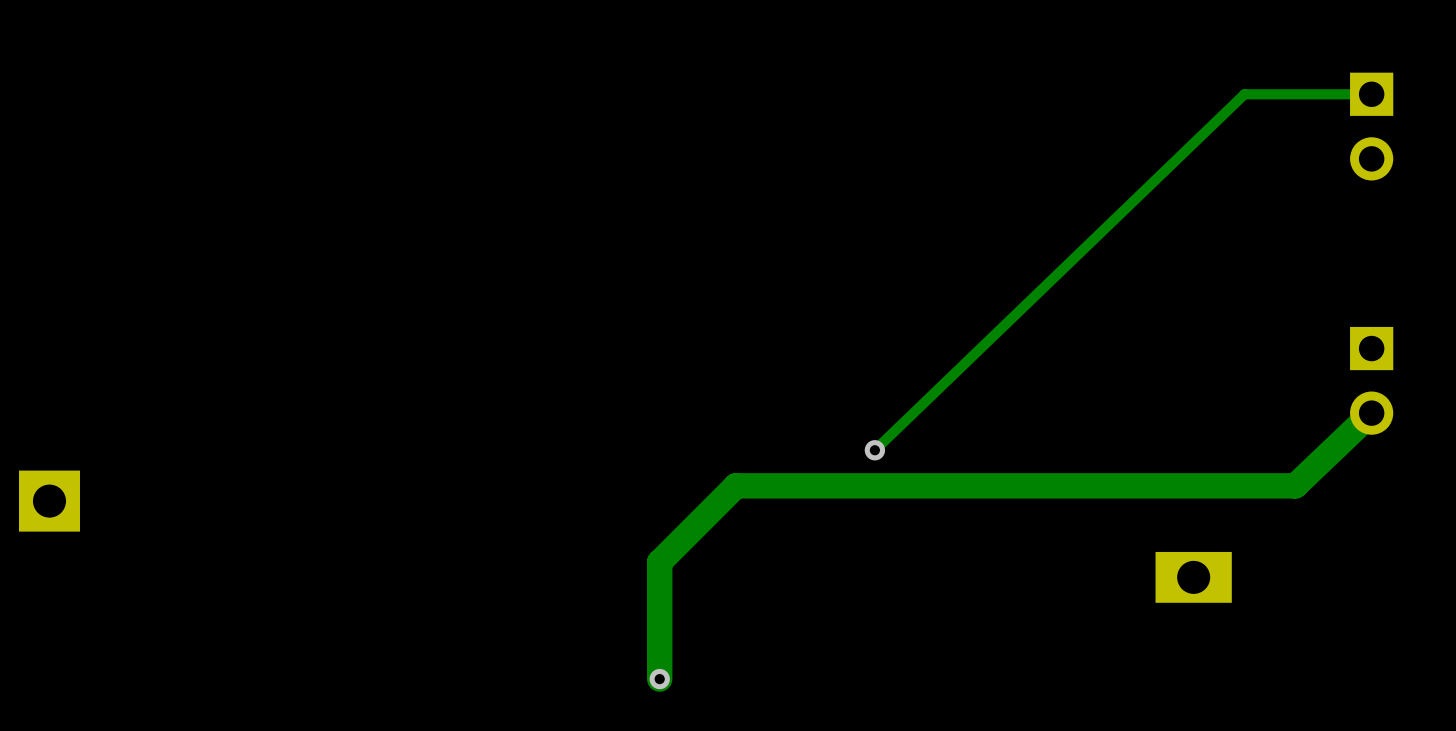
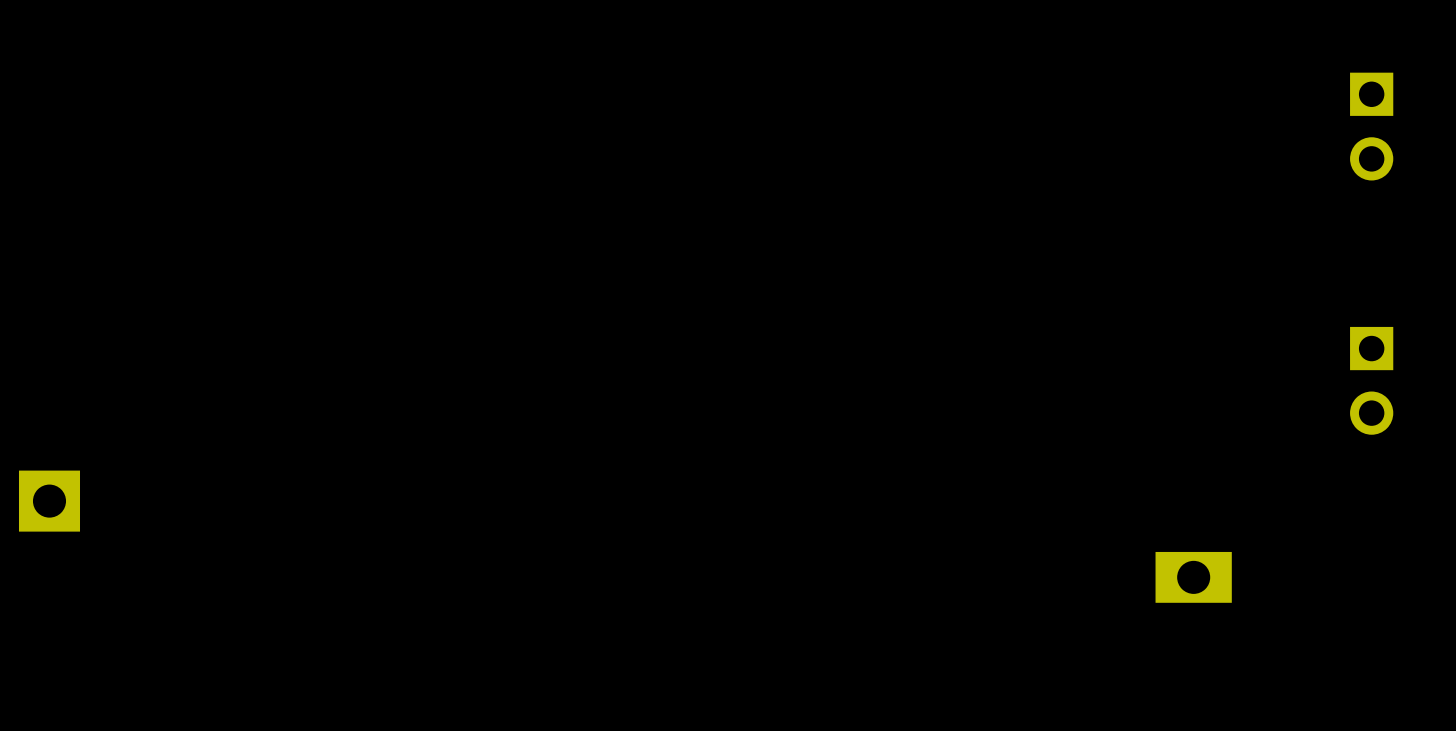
track: (1371, 94) (1244, 94) (874, 450) -> none
track: (1371, 413) (1295, 485) (736, 485) (659, 562) (659, 679) -> none
via: (874, 450) -> none
via: (659, 679) -> none

